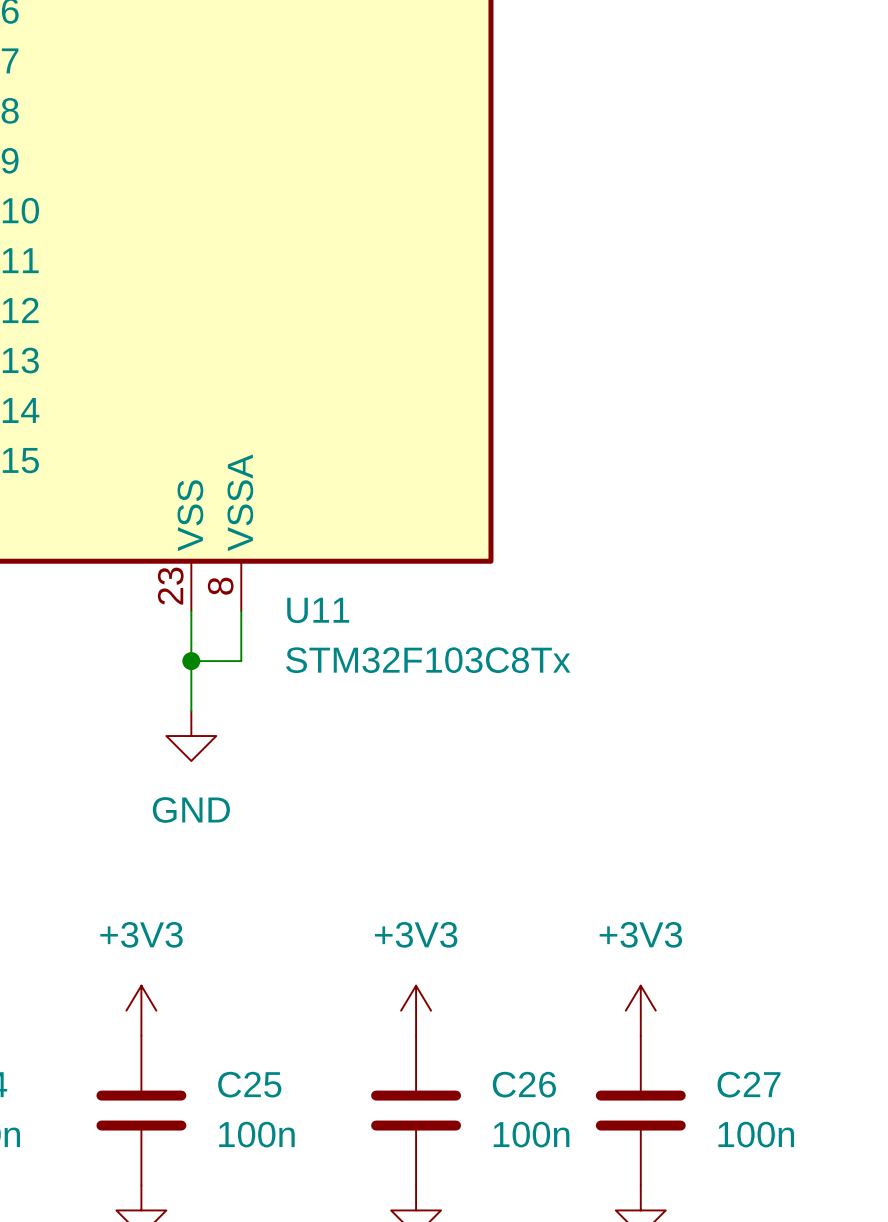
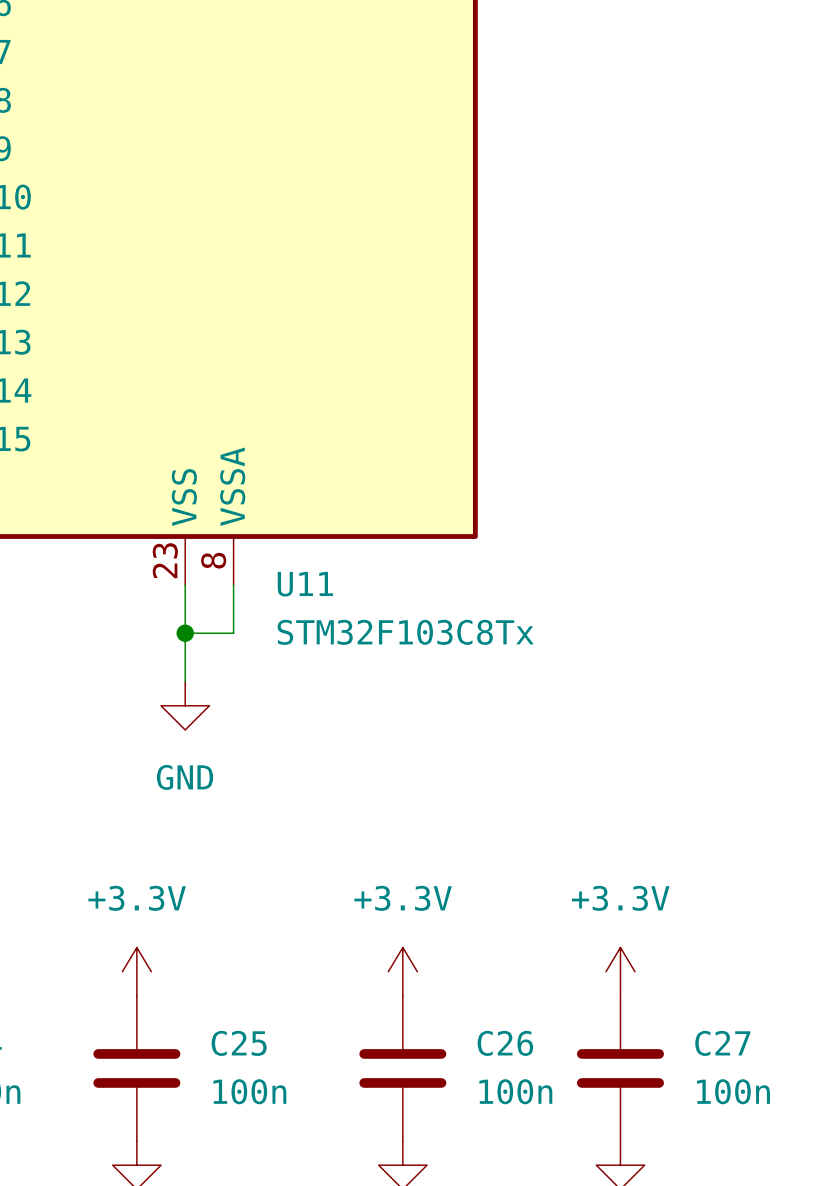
power symbol: +3V3 (141, 1010) -> +3.3V (136, 971)
power symbol: +3V3 (416, 1010) -> +3.3V (402, 971)
power symbol: +3V3 (640, 1010) -> +3.3V (620, 971)

